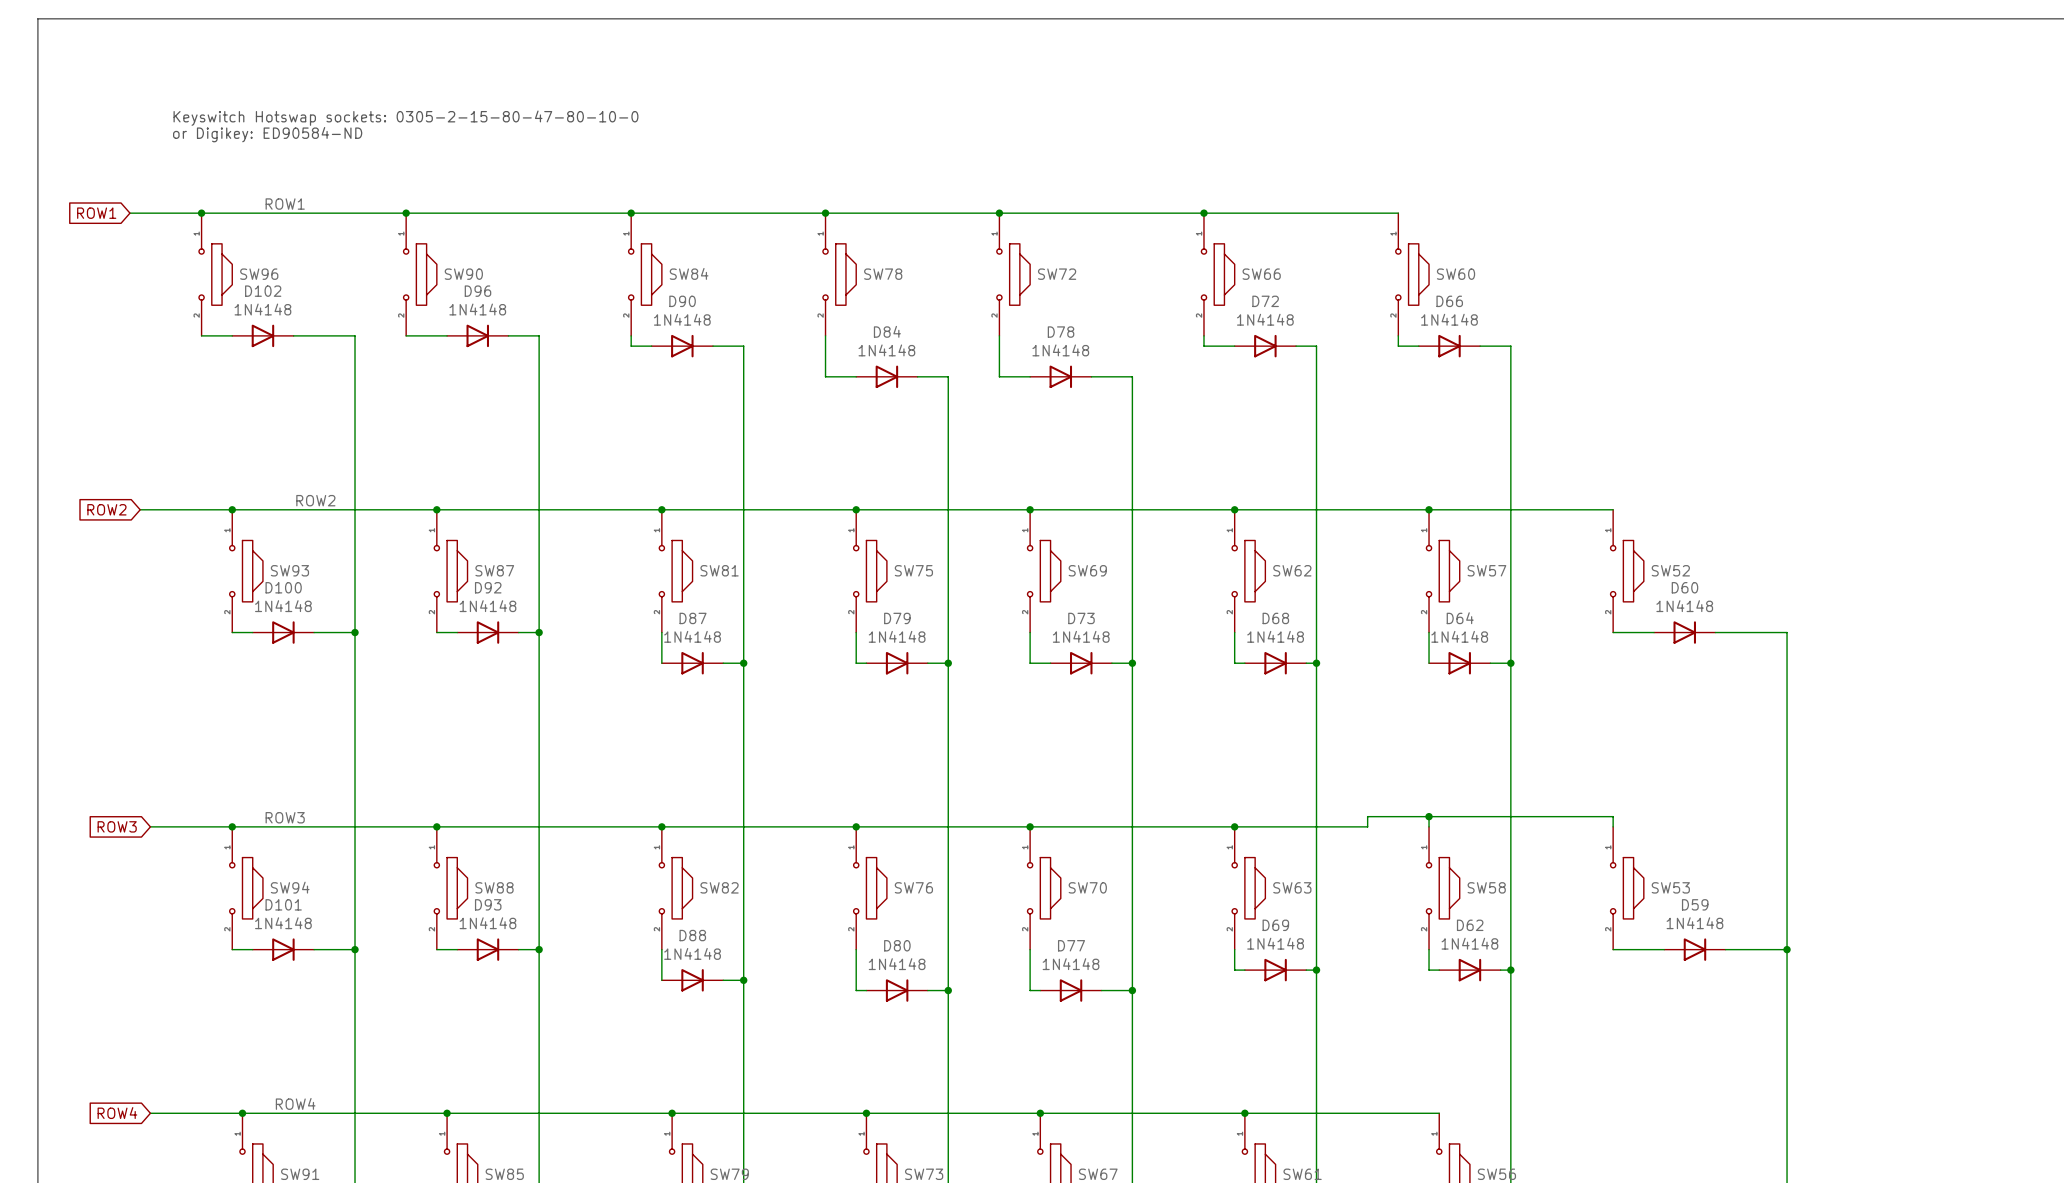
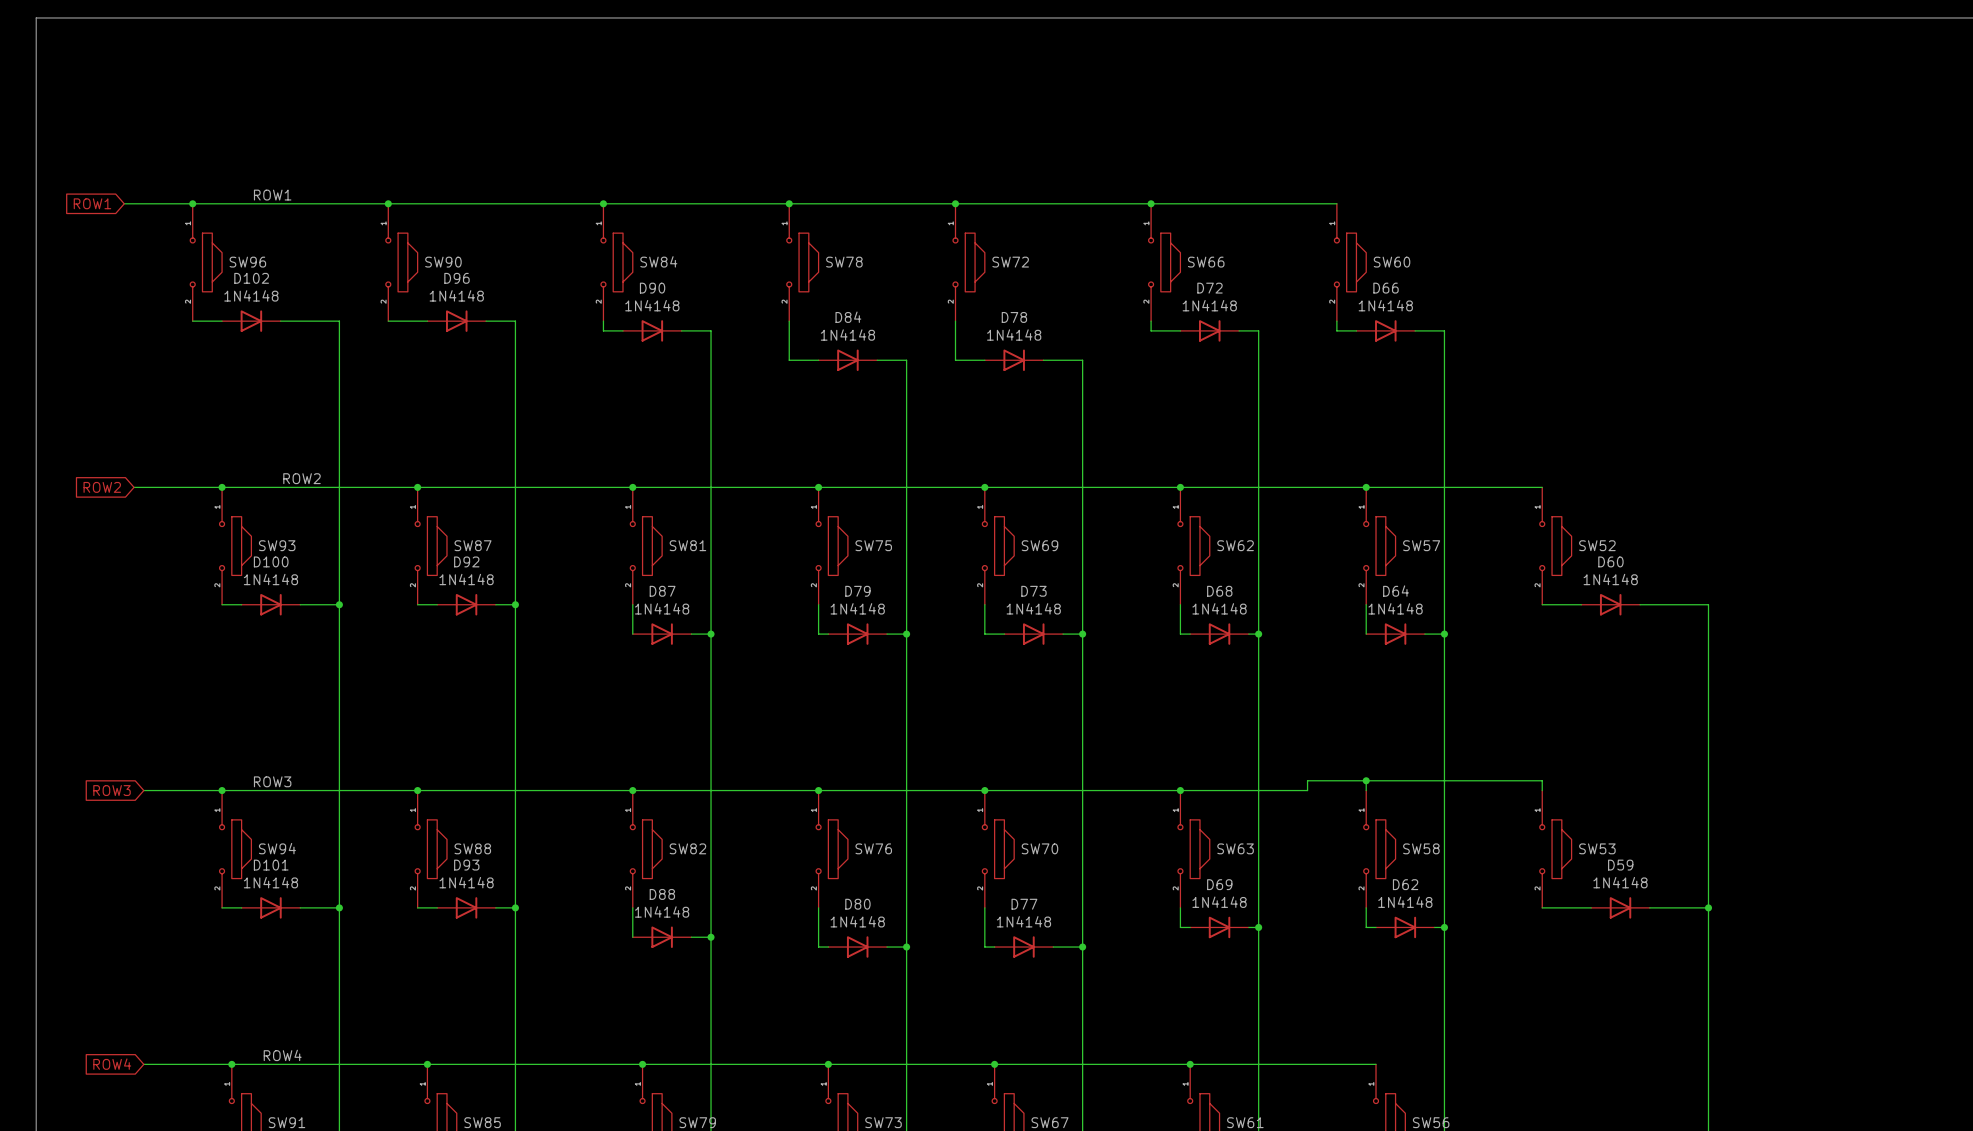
text: Keyswitch Hotswap sockets: 0305-2-15-80-47-80-10-0 (405, 118) -> none
text: or Digikey: ED90584-ND (267, 134) -> none

